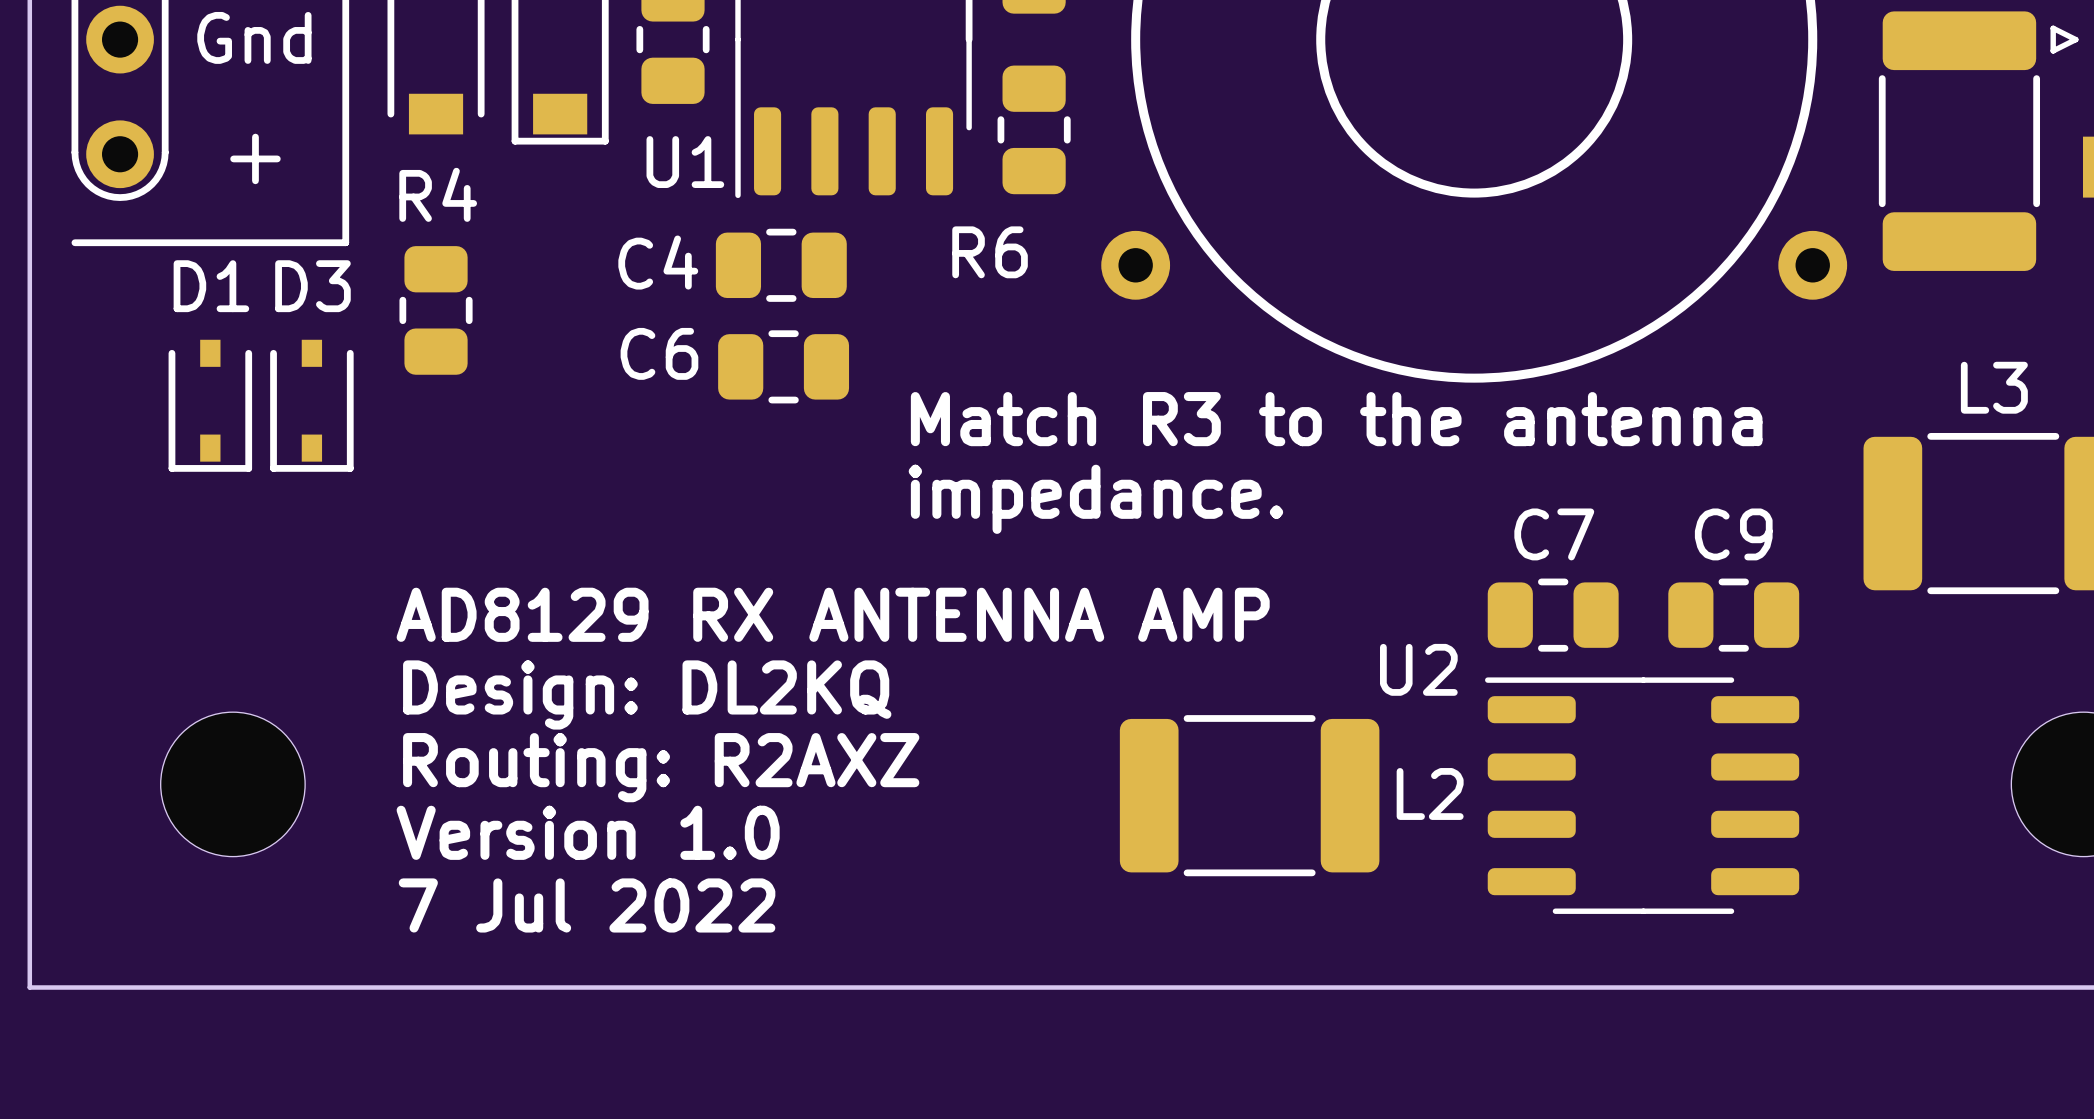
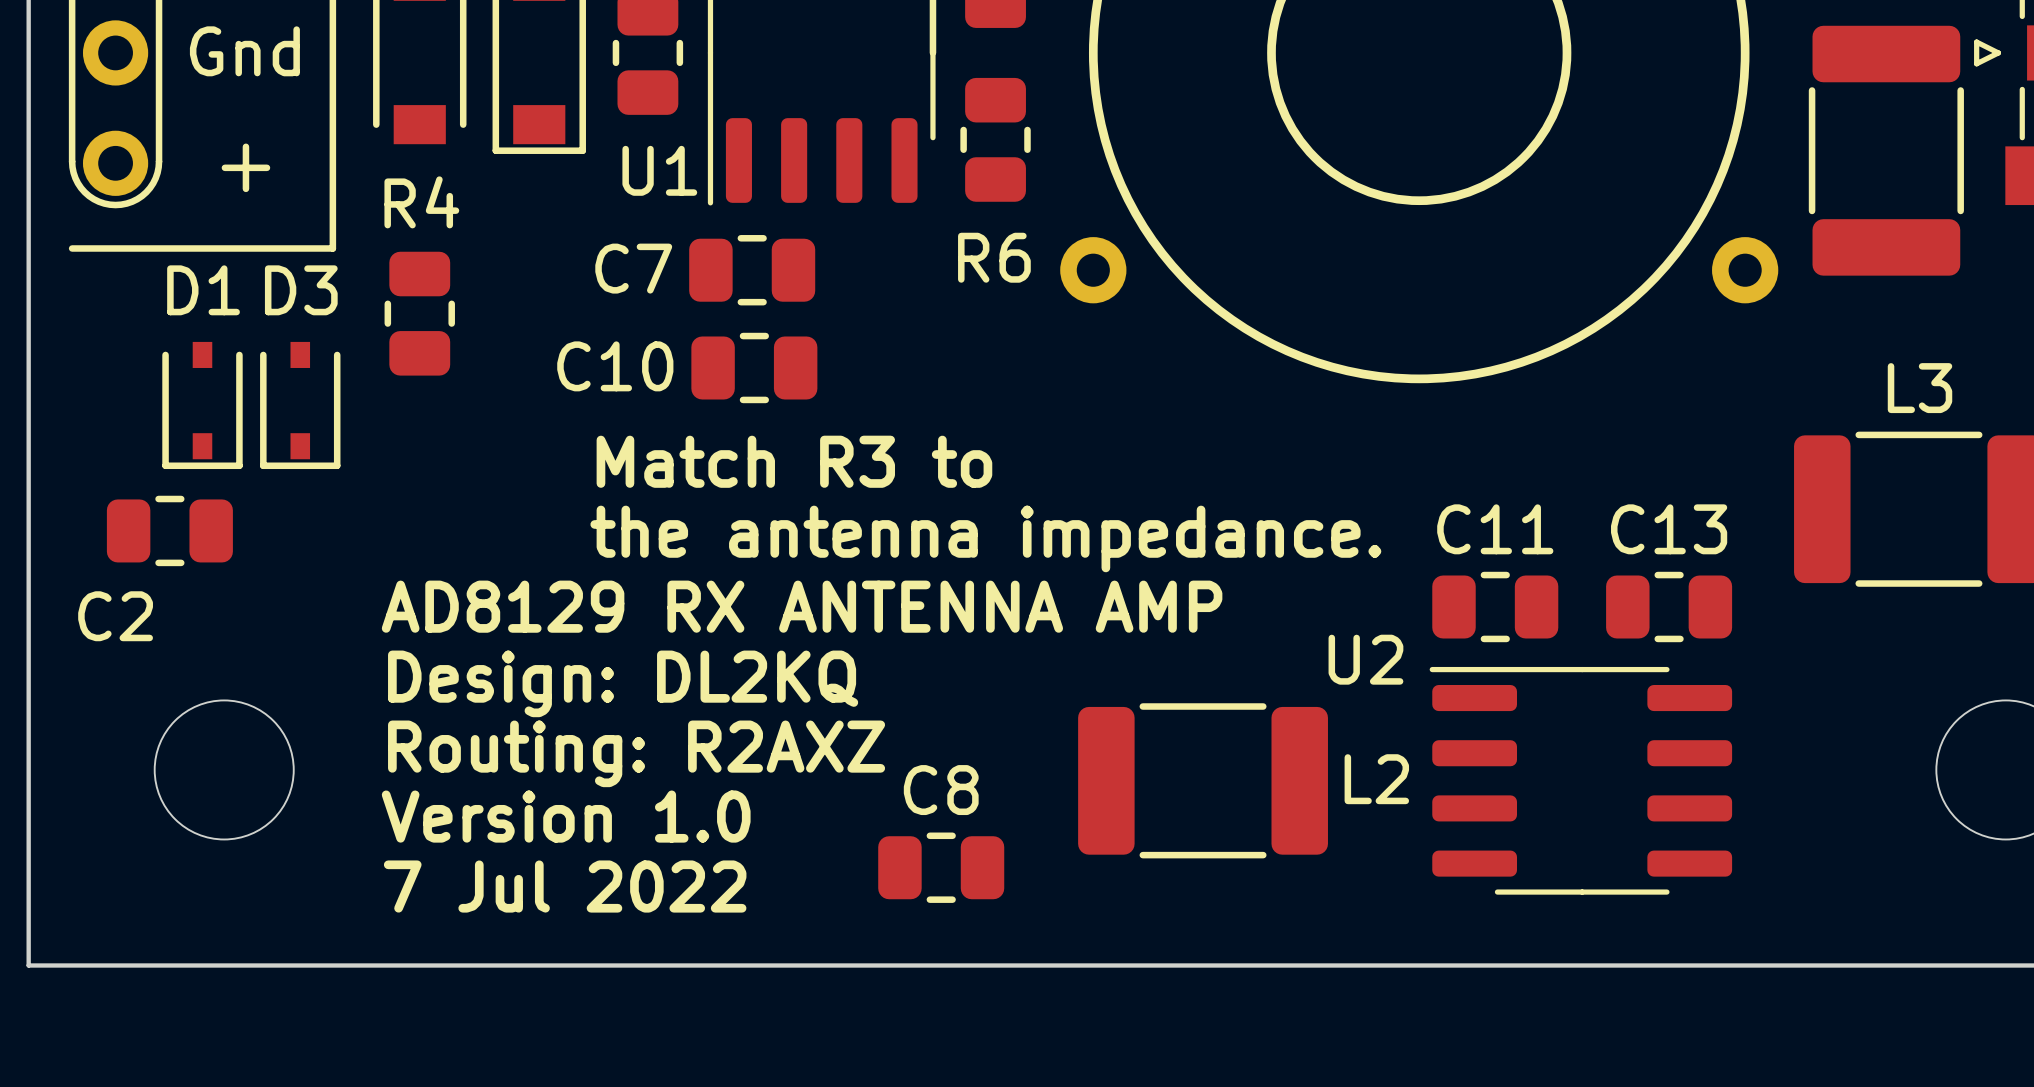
R6 name position: R6 (990, 252) -> R6 (994, 257)
C4 name: C4 (658, 262) -> C7 (633, 268)
C6 name: C6 (659, 353) -> C10 (615, 366)
text: Match R3 to the antenna (1336, 419) -> Match R3 to (794, 461)
text: impedance. (1095, 499) -> the antenna impedance. (985, 538)
C7 name: C7 (1554, 534) -> C11 (1495, 529)
C9 name: C9 (1733, 534) -> C13 (1669, 529)
C2: none -> (169, 530)
C8: none -> (941, 867)

